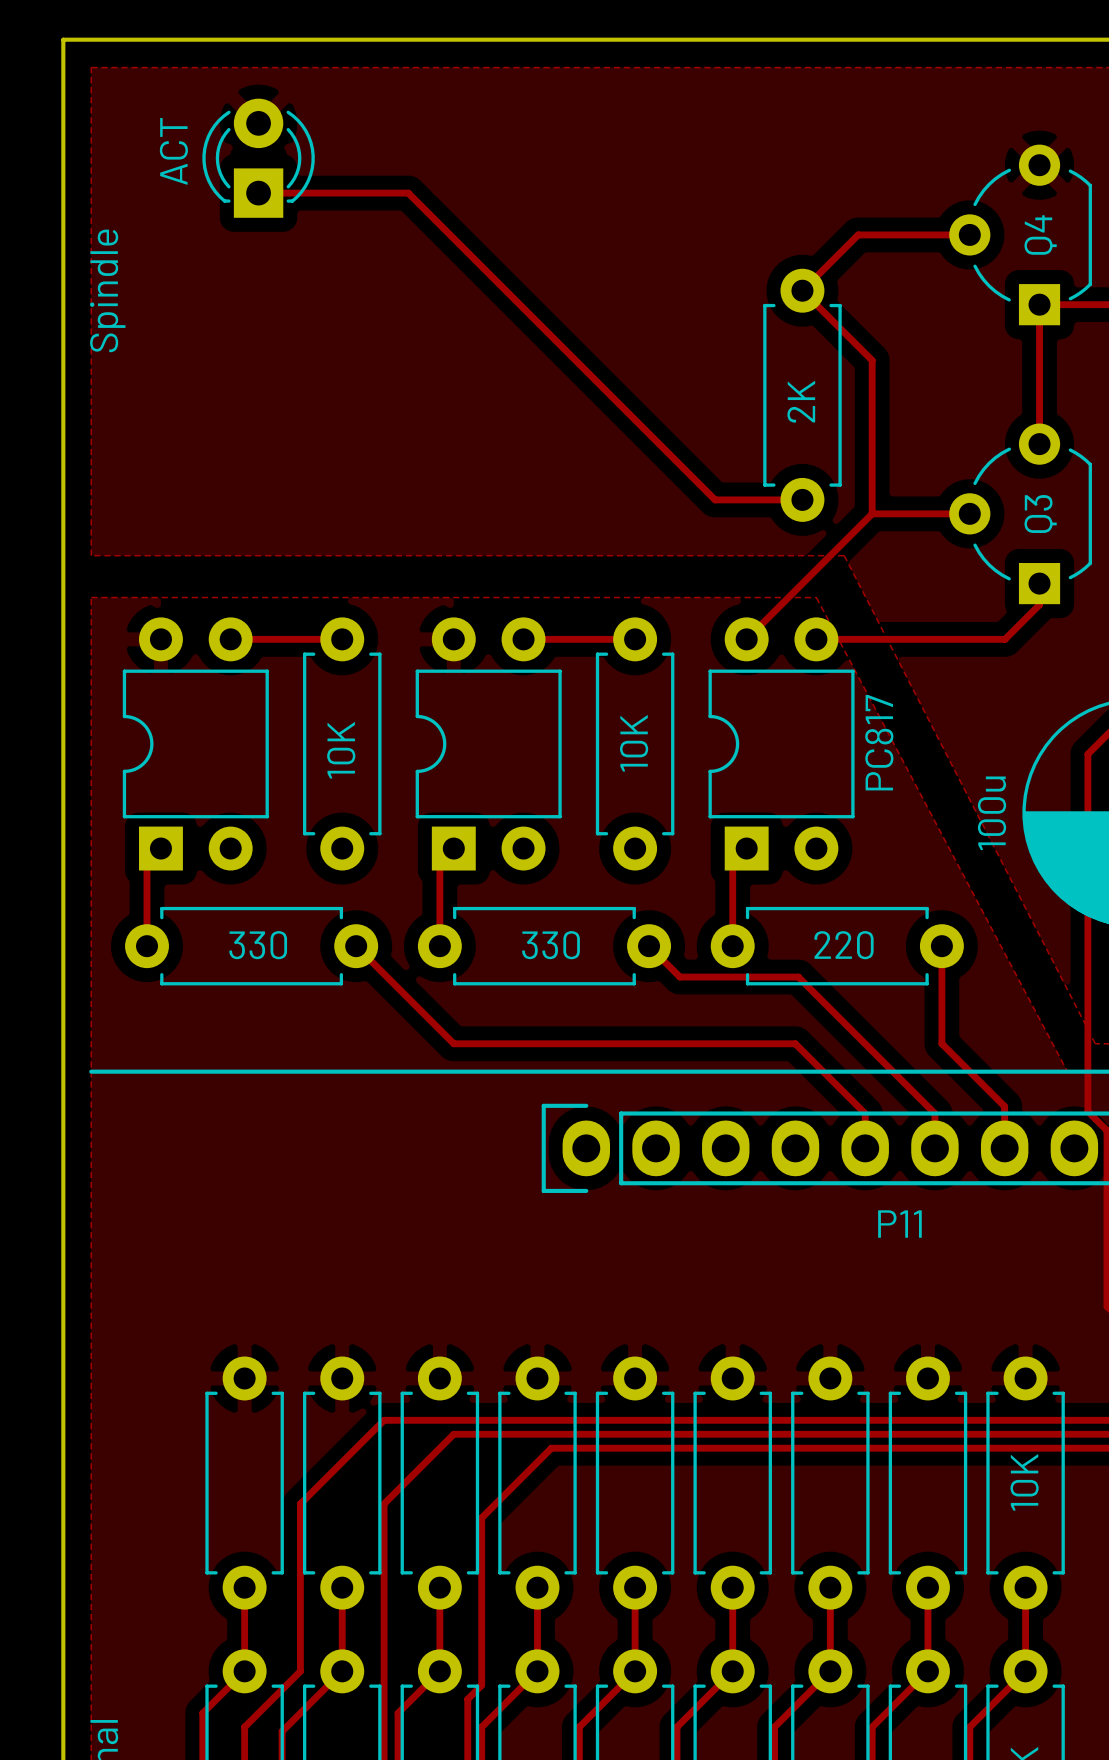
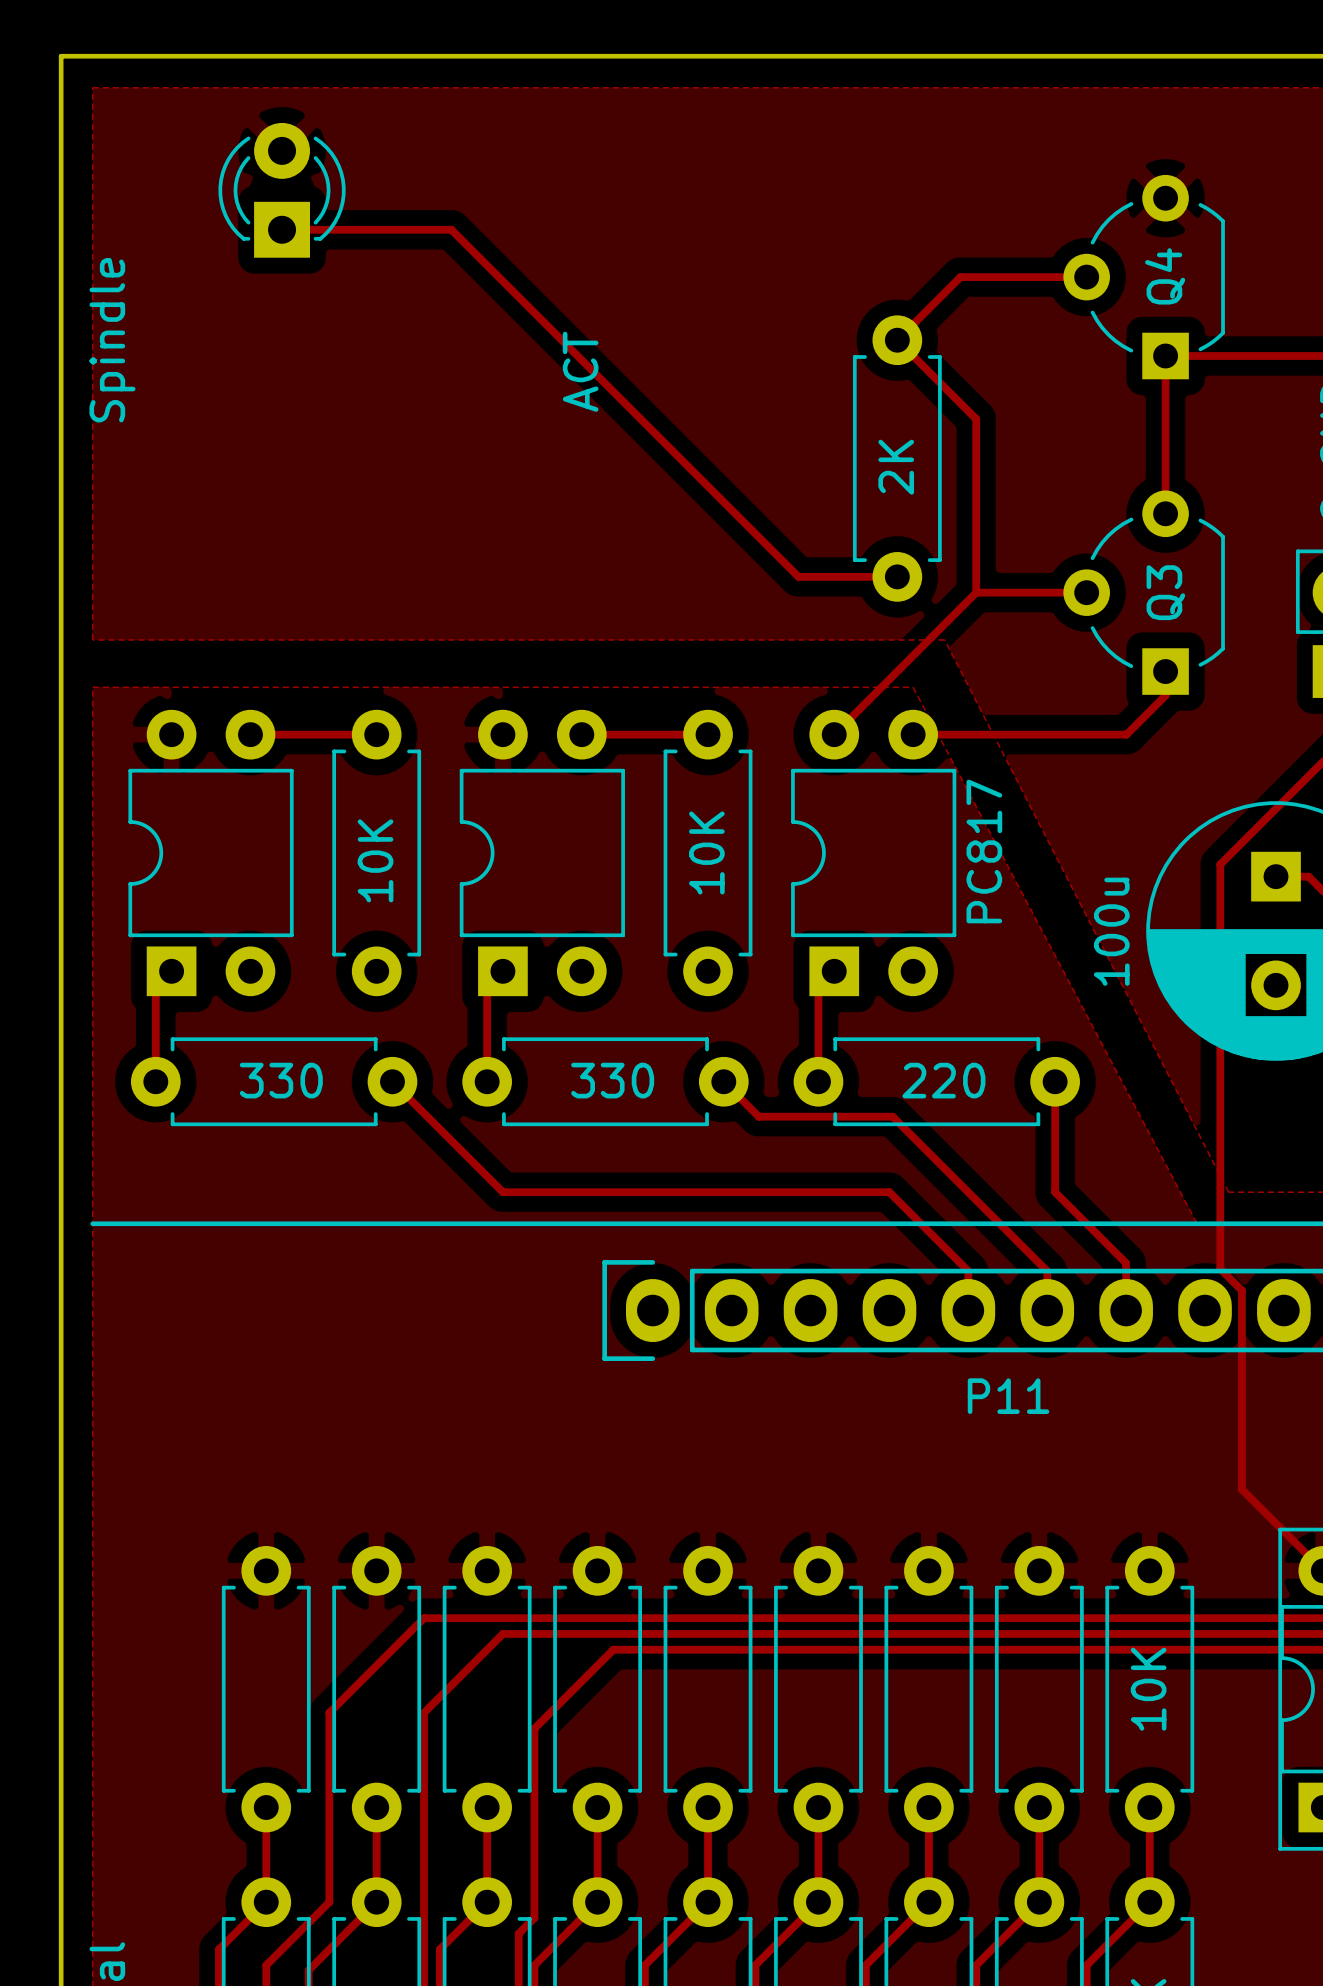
text position: ACT (173, 151) -> ACT (580, 371)

